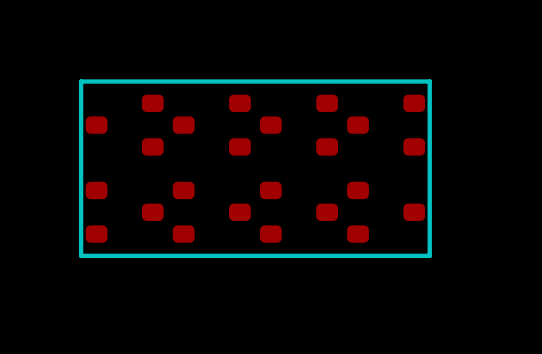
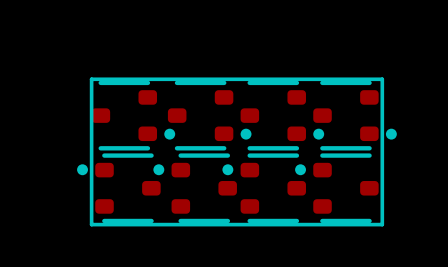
part footprint: [85, 94, 164, 156] -> [91, 80, 176, 151]
part footprint: [172, 94, 251, 156] -> [167, 80, 252, 151]
part footprint: [259, 94, 338, 156] -> [240, 80, 325, 151]
part footprint: [347, 94, 426, 156] -> [313, 80, 397, 151]
part footprint: [85, 181, 164, 243] -> [77, 153, 161, 224]
part footprint: [172, 181, 251, 243] -> [153, 153, 237, 224]
part footprint: [259, 181, 338, 243] -> [222, 153, 306, 224]
part footprint: [347, 181, 426, 243] -> [295, 153, 379, 224]

